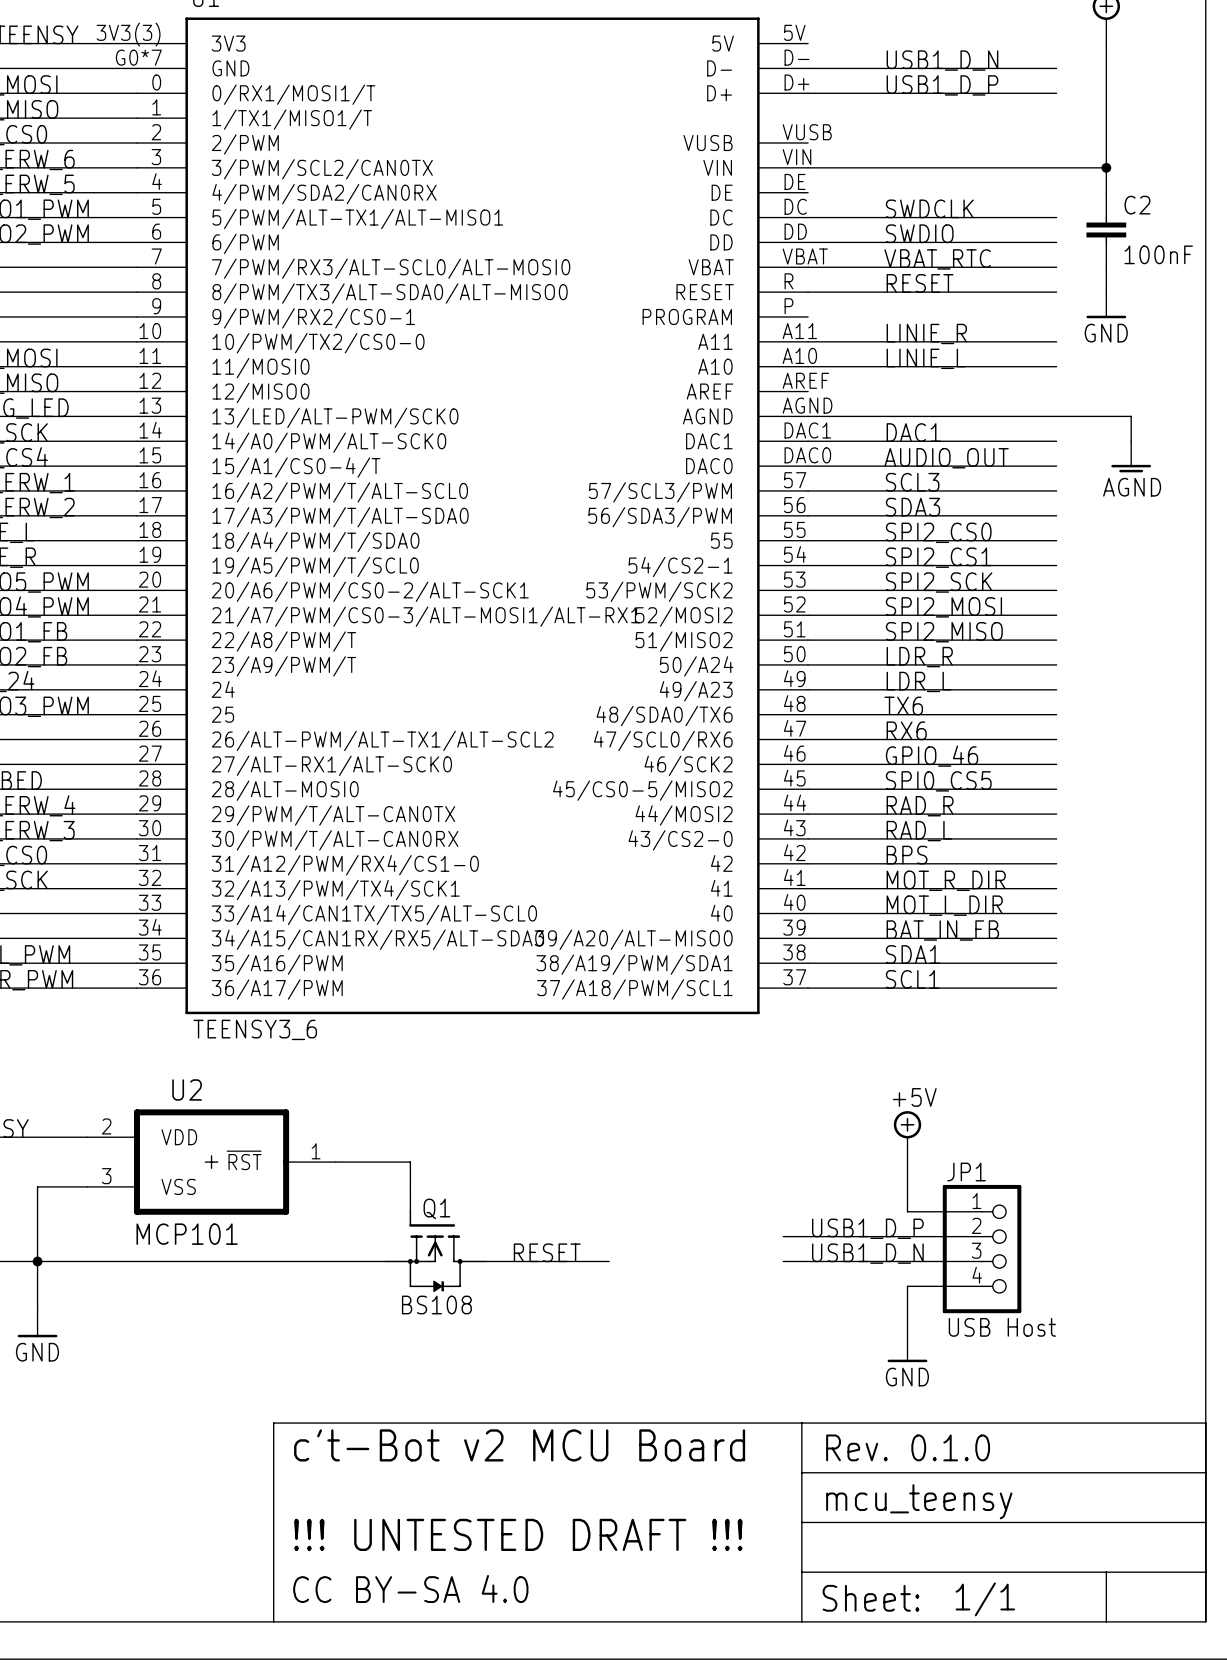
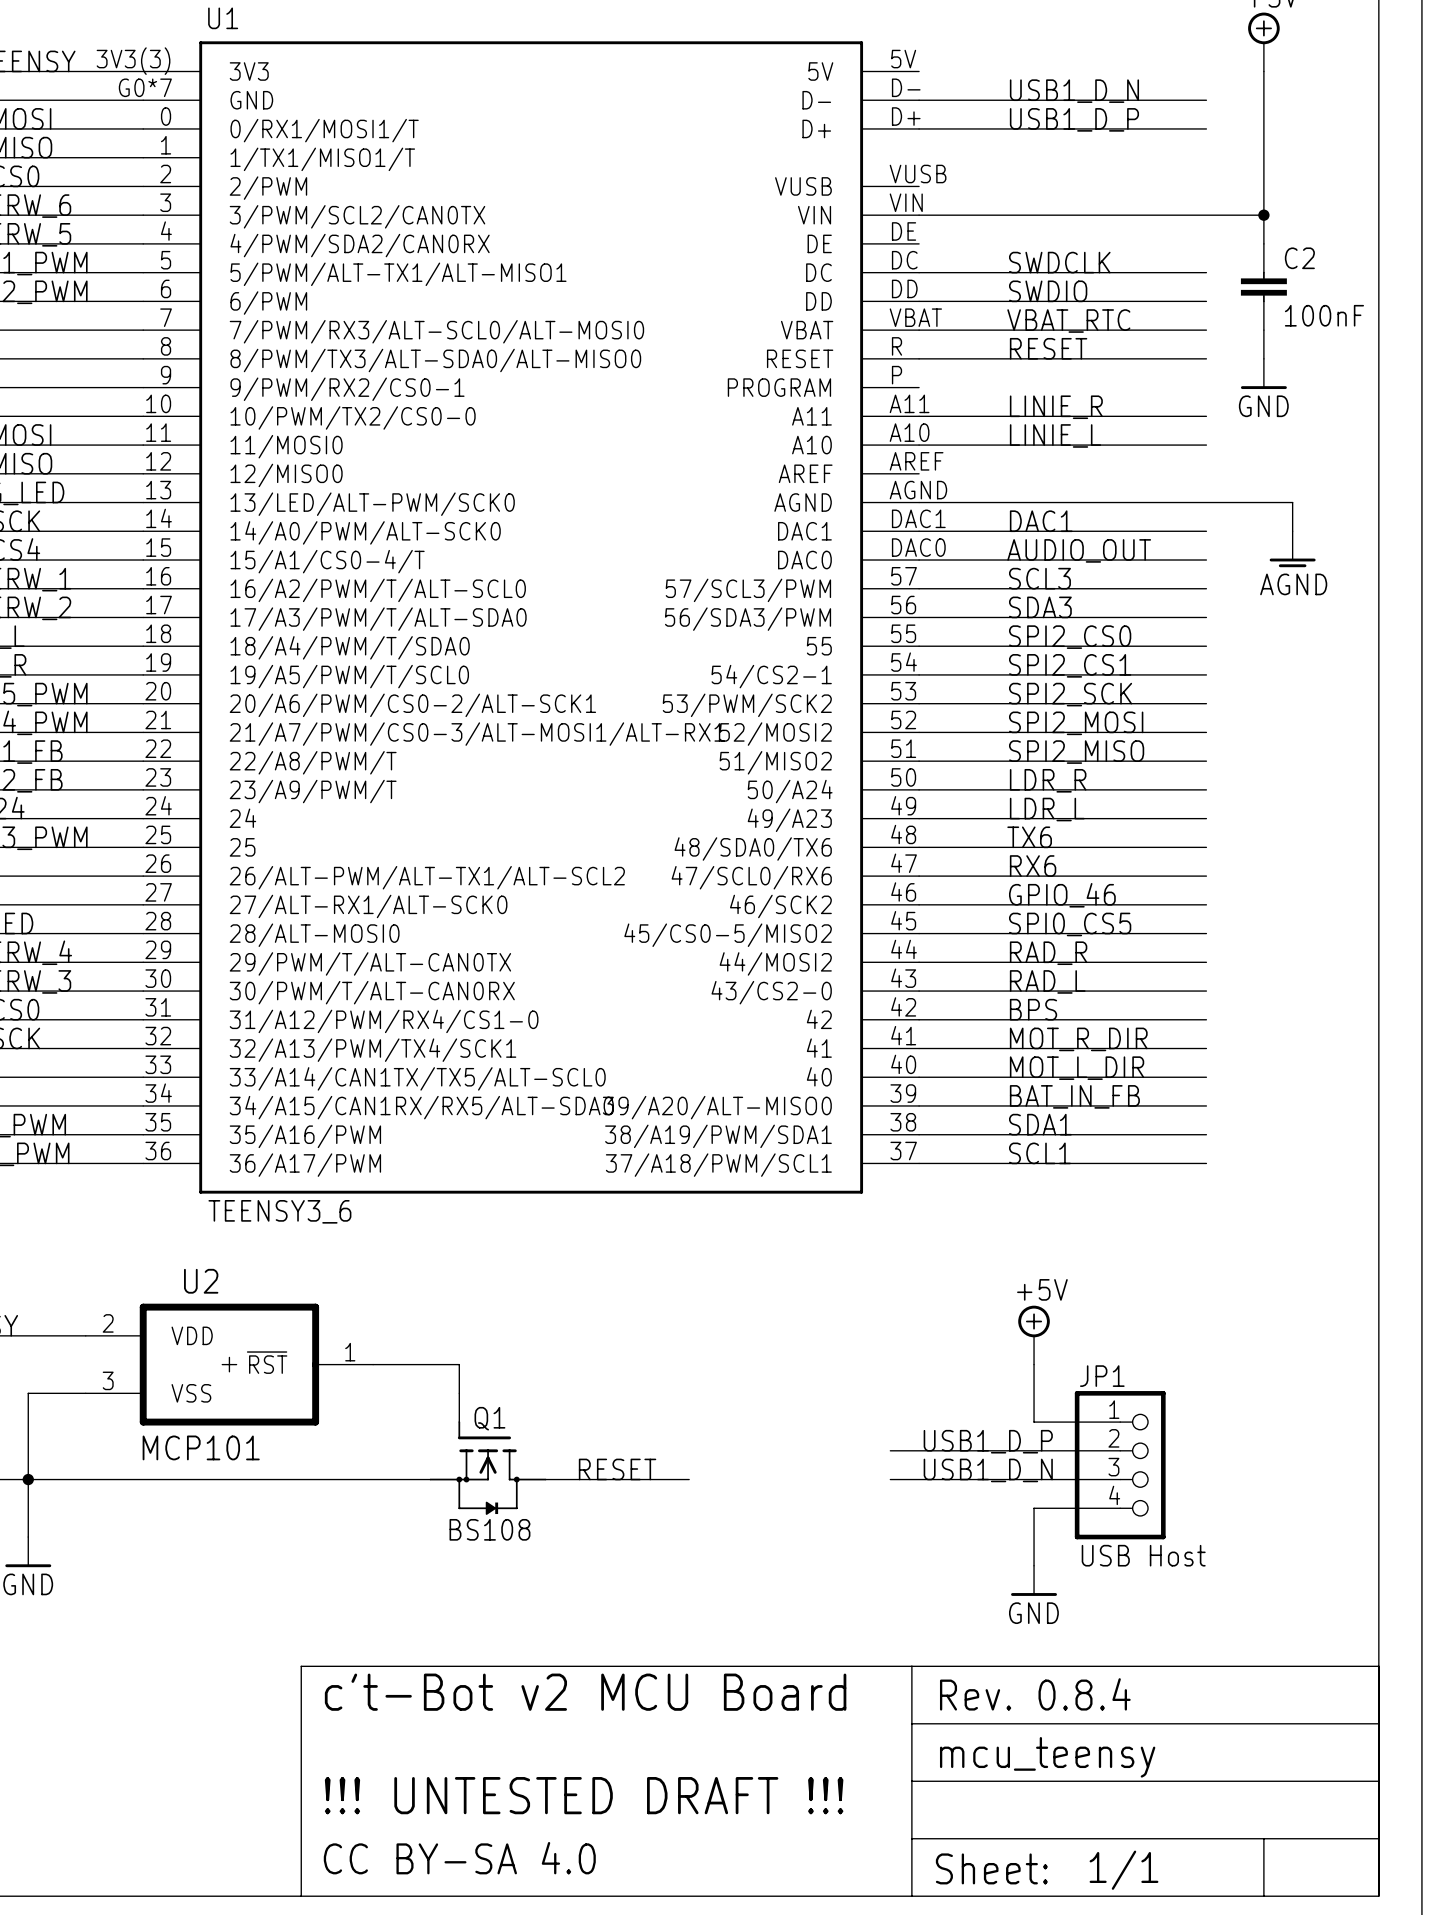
text: Rev. 0.1.0 (908, 1447) -> Rev. 0.8.4 (1035, 1694)

